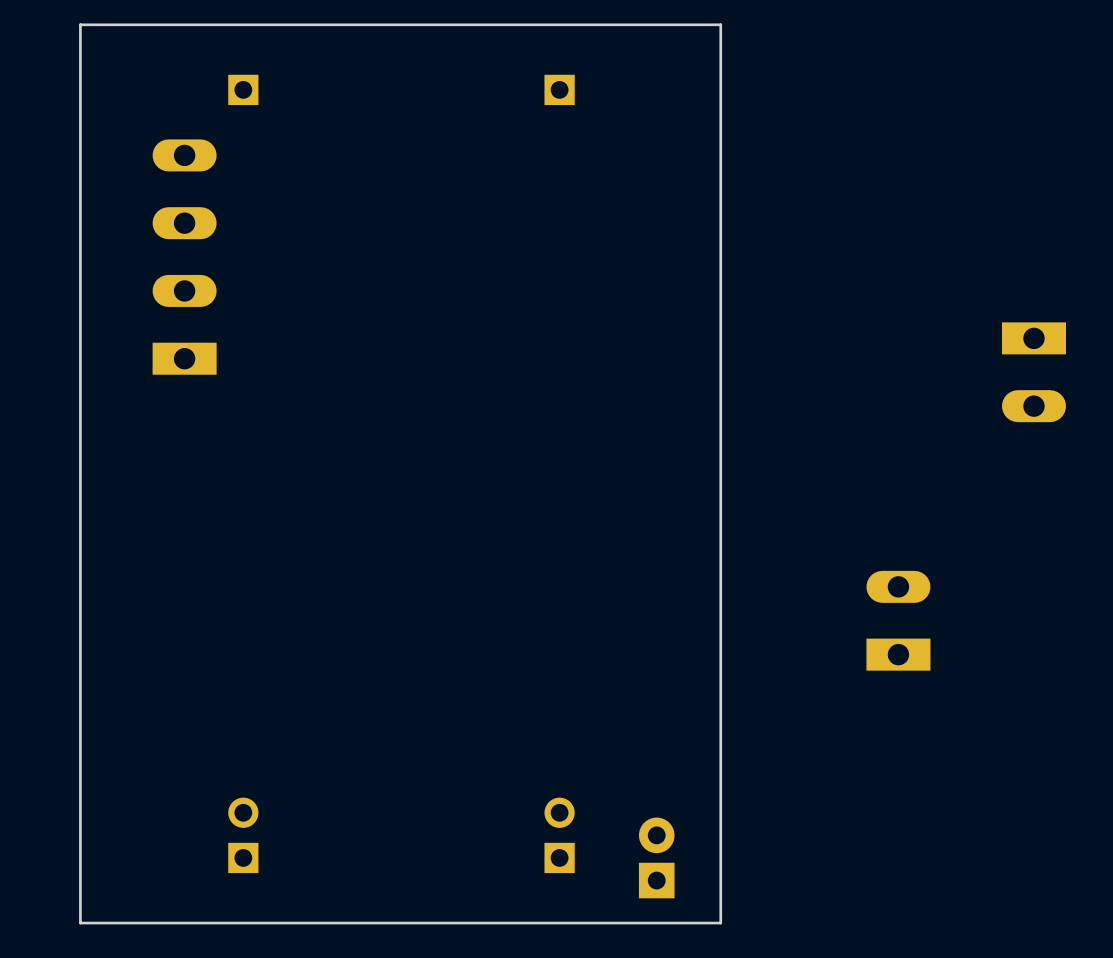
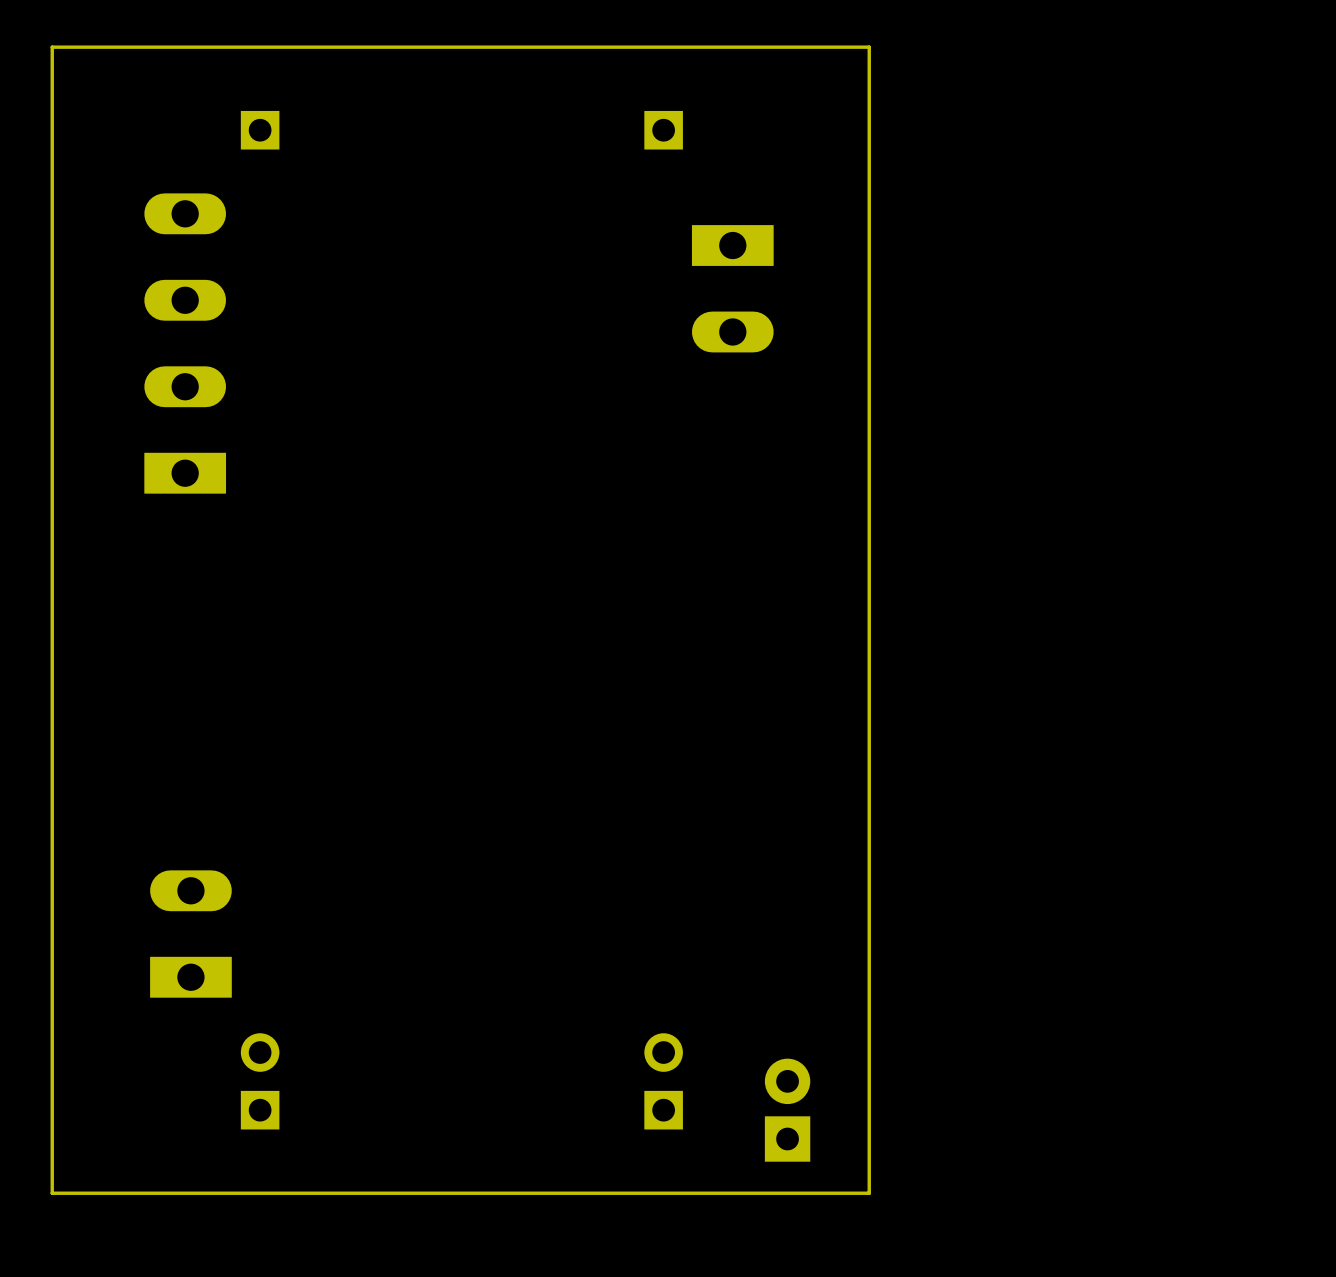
part: none -> (732, 288)
part: (1033, 372) -> none
part: (898, 620) -> none
part: none -> (190, 934)

